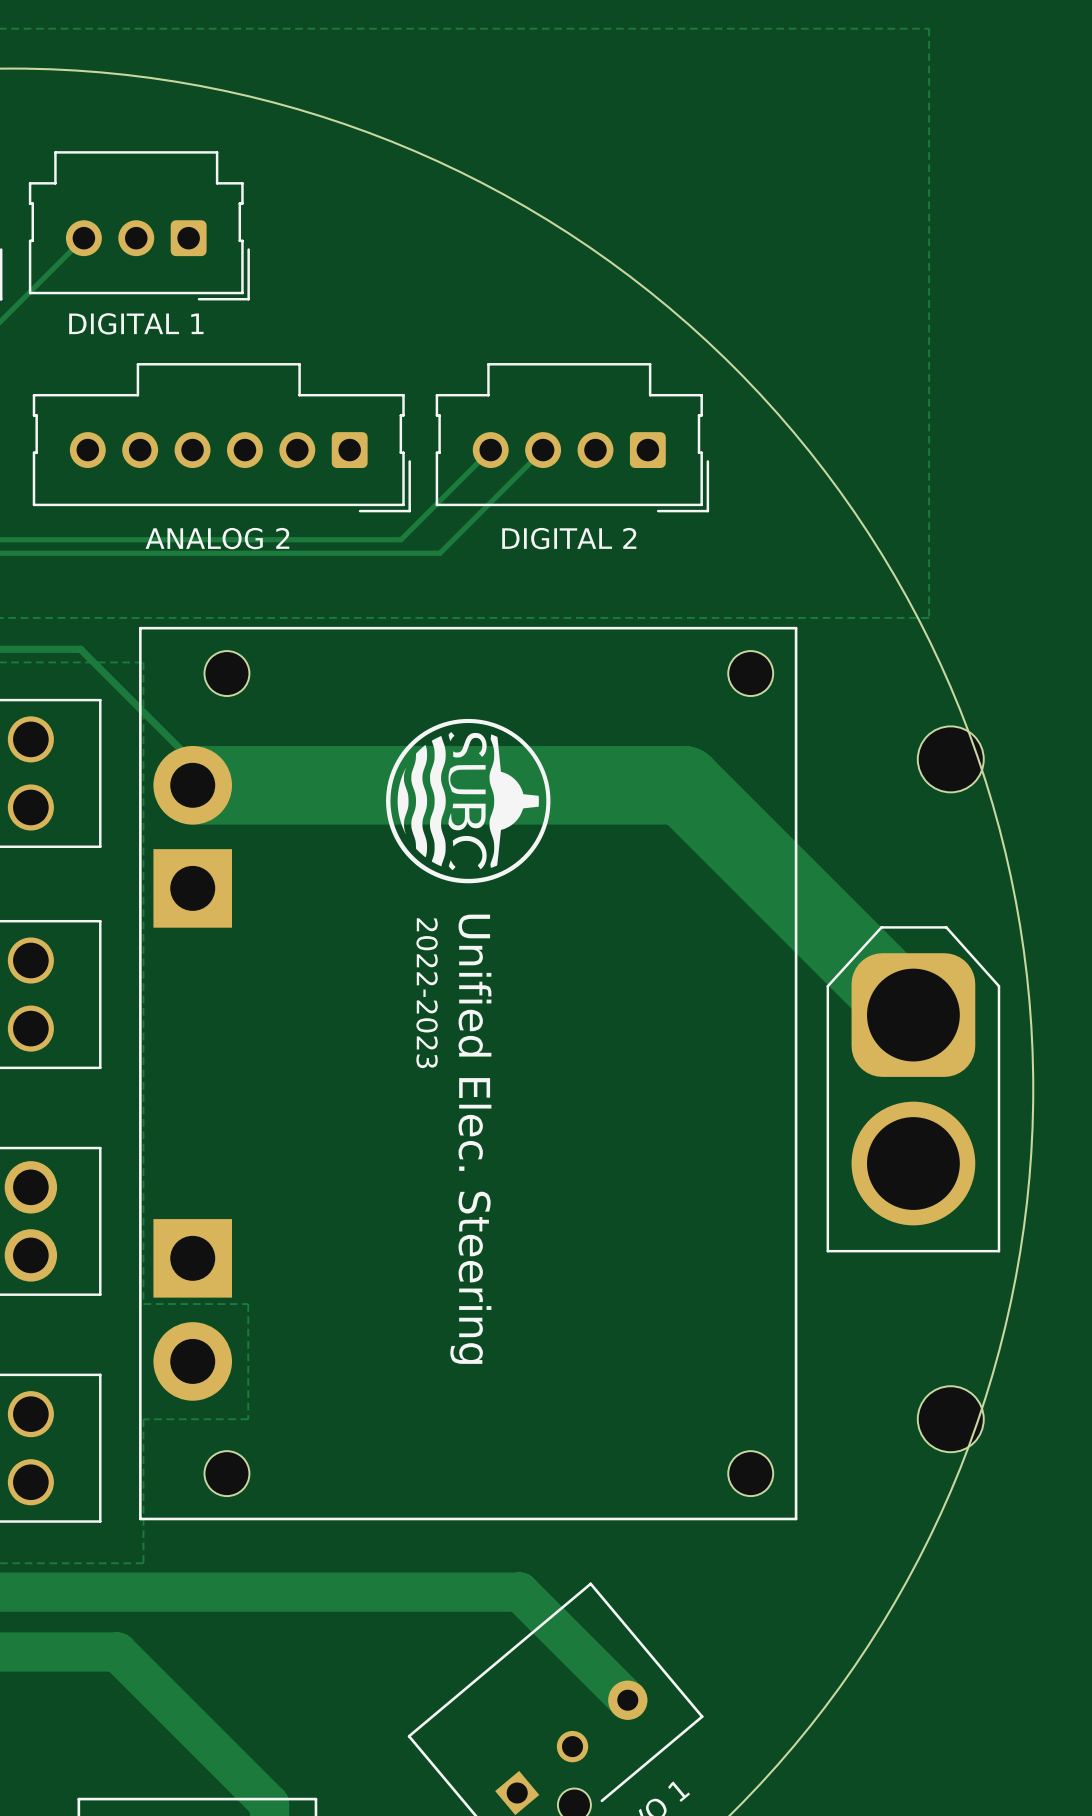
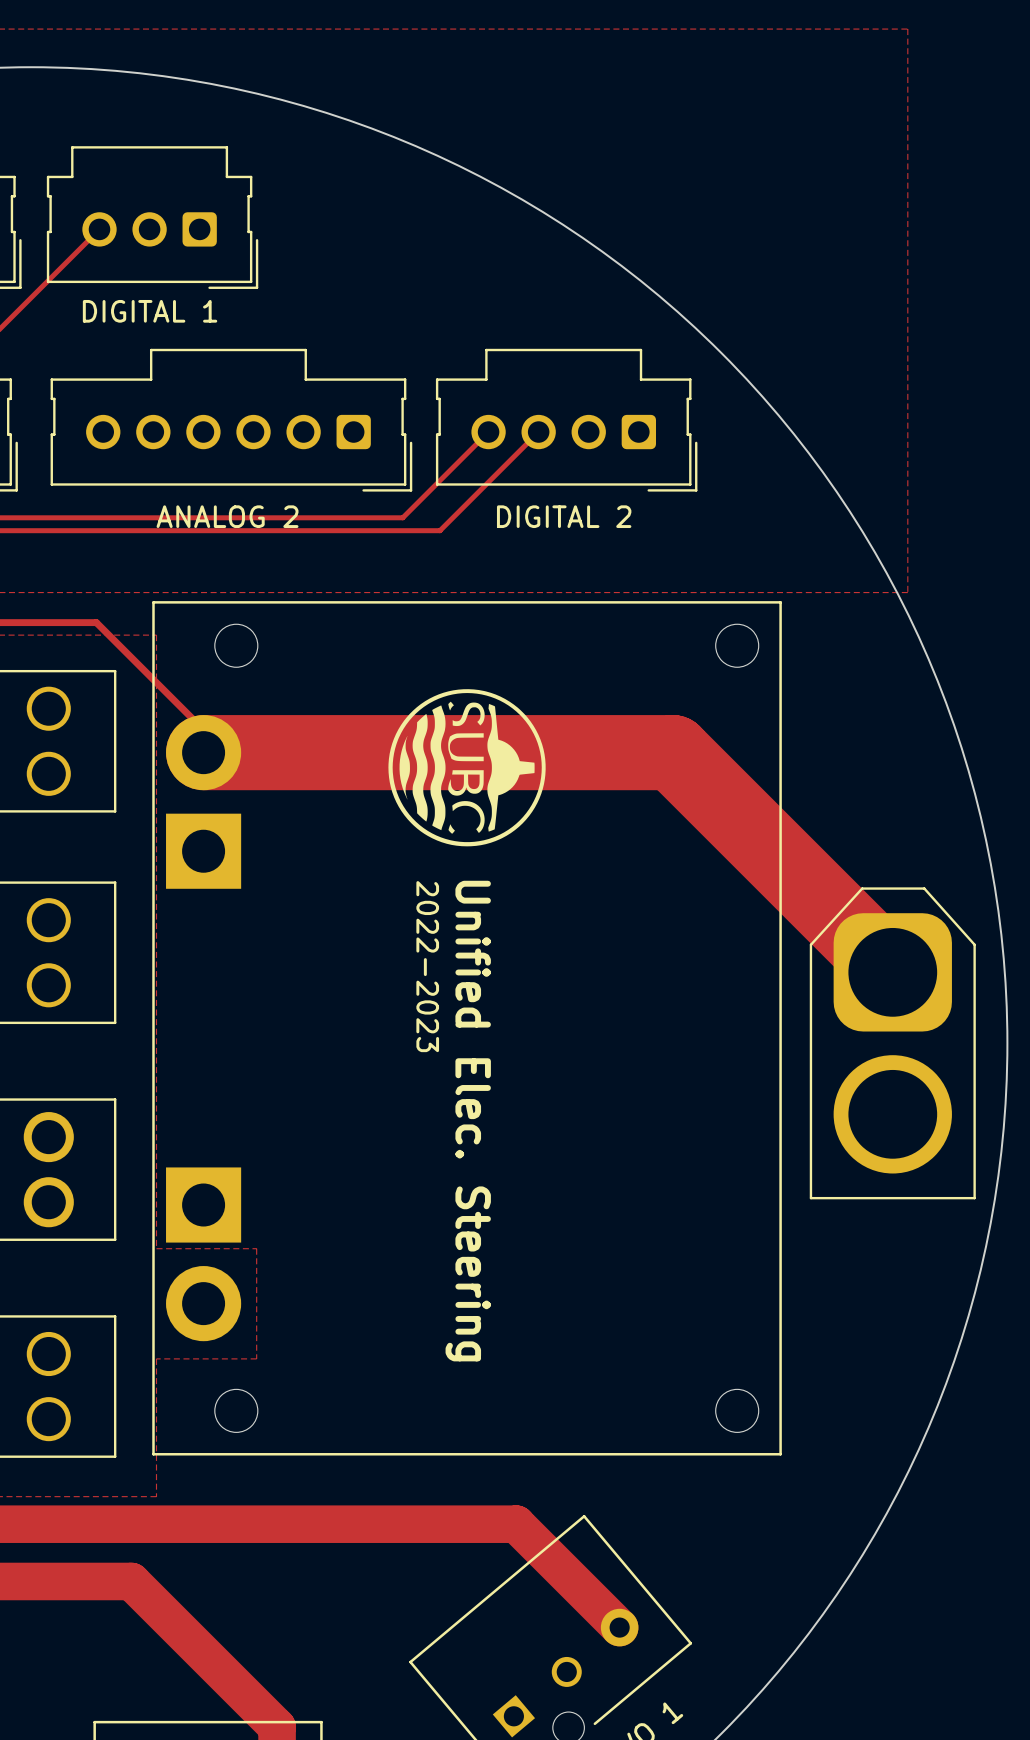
part: (950, 759) -> none
part: (950, 1419) -> none

